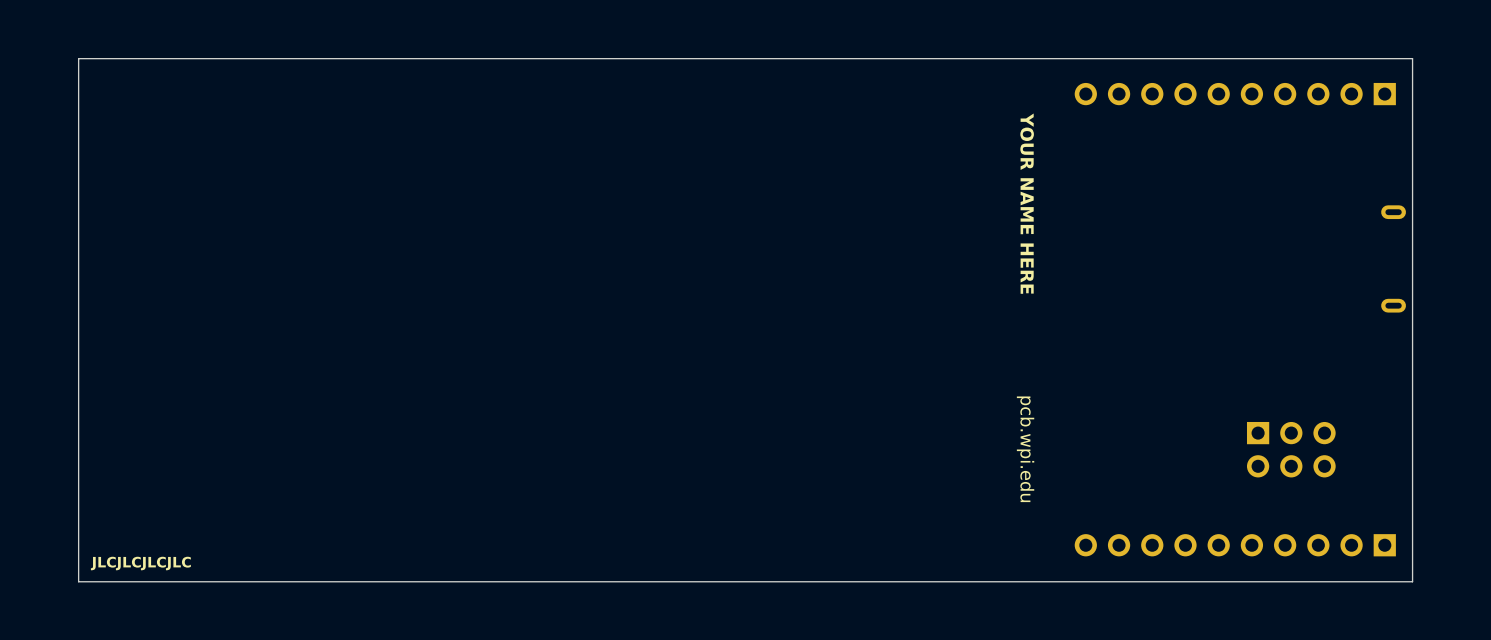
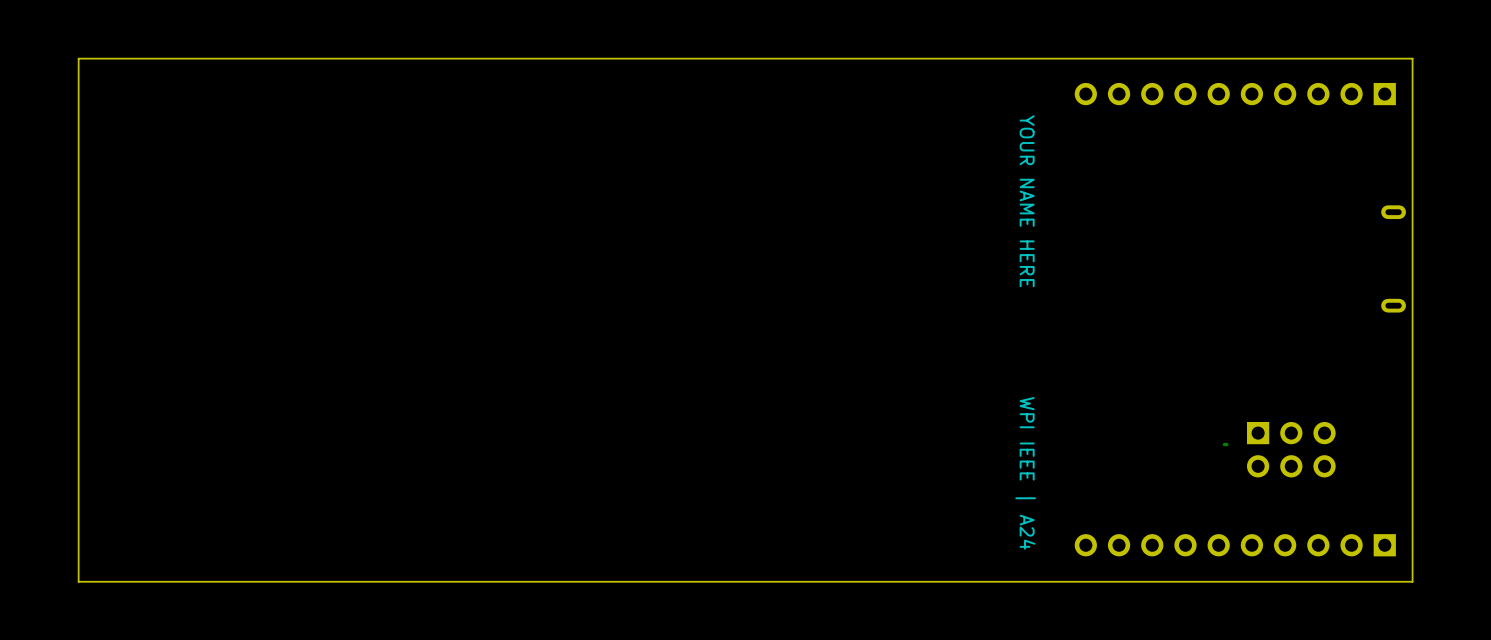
track: none -> (1226, 444) (1224, 444)
text: pcb.wpi.edu (1025, 449) -> WPI IEEE | A24 (1025, 473)
text: JLCJLCJLCJLC (140, 563) -> none

